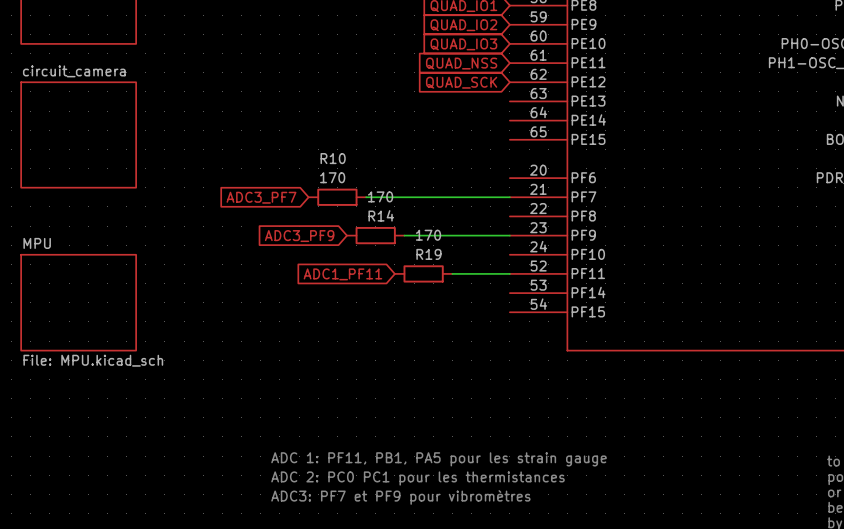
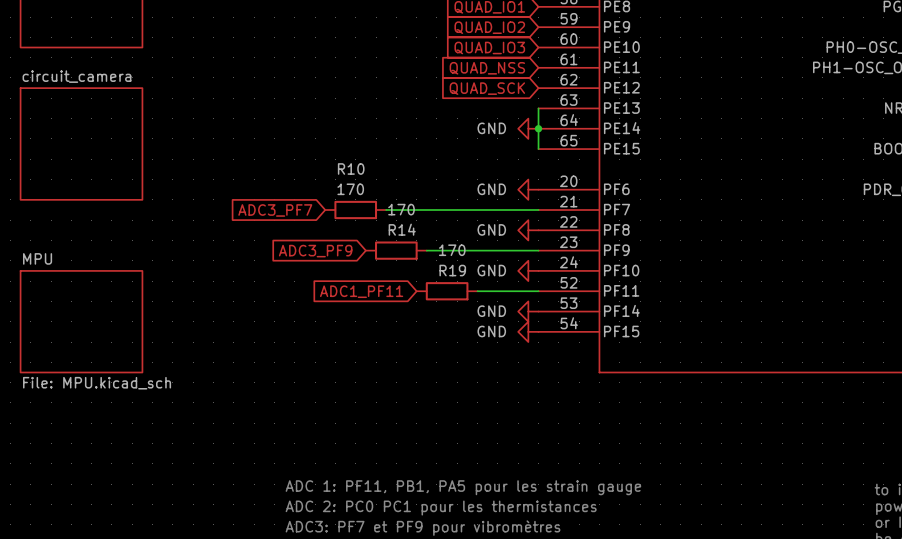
wire: none -> (538, 108) (538, 149)
power symbol: none -> GND (528, 128)
junction: none -> (538, 128)
power symbol: none -> GND (528, 189)
power symbol: none -> GND (528, 230)
power symbol: none -> GND (528, 270)
power symbol: none -> GND (528, 311)
power symbol: none -> GND (528, 331)

